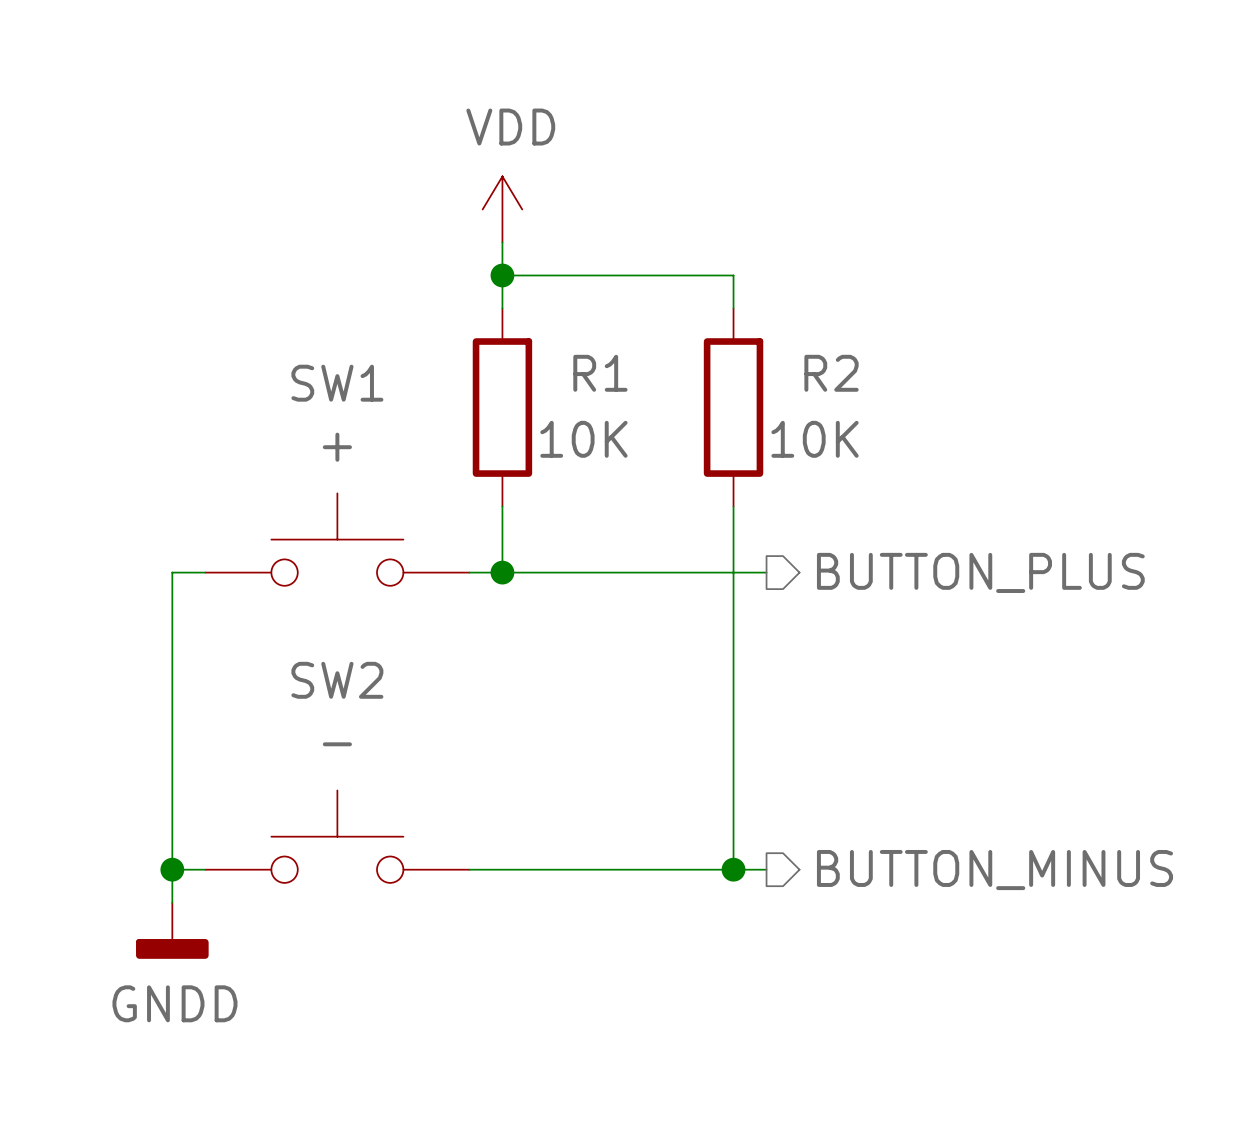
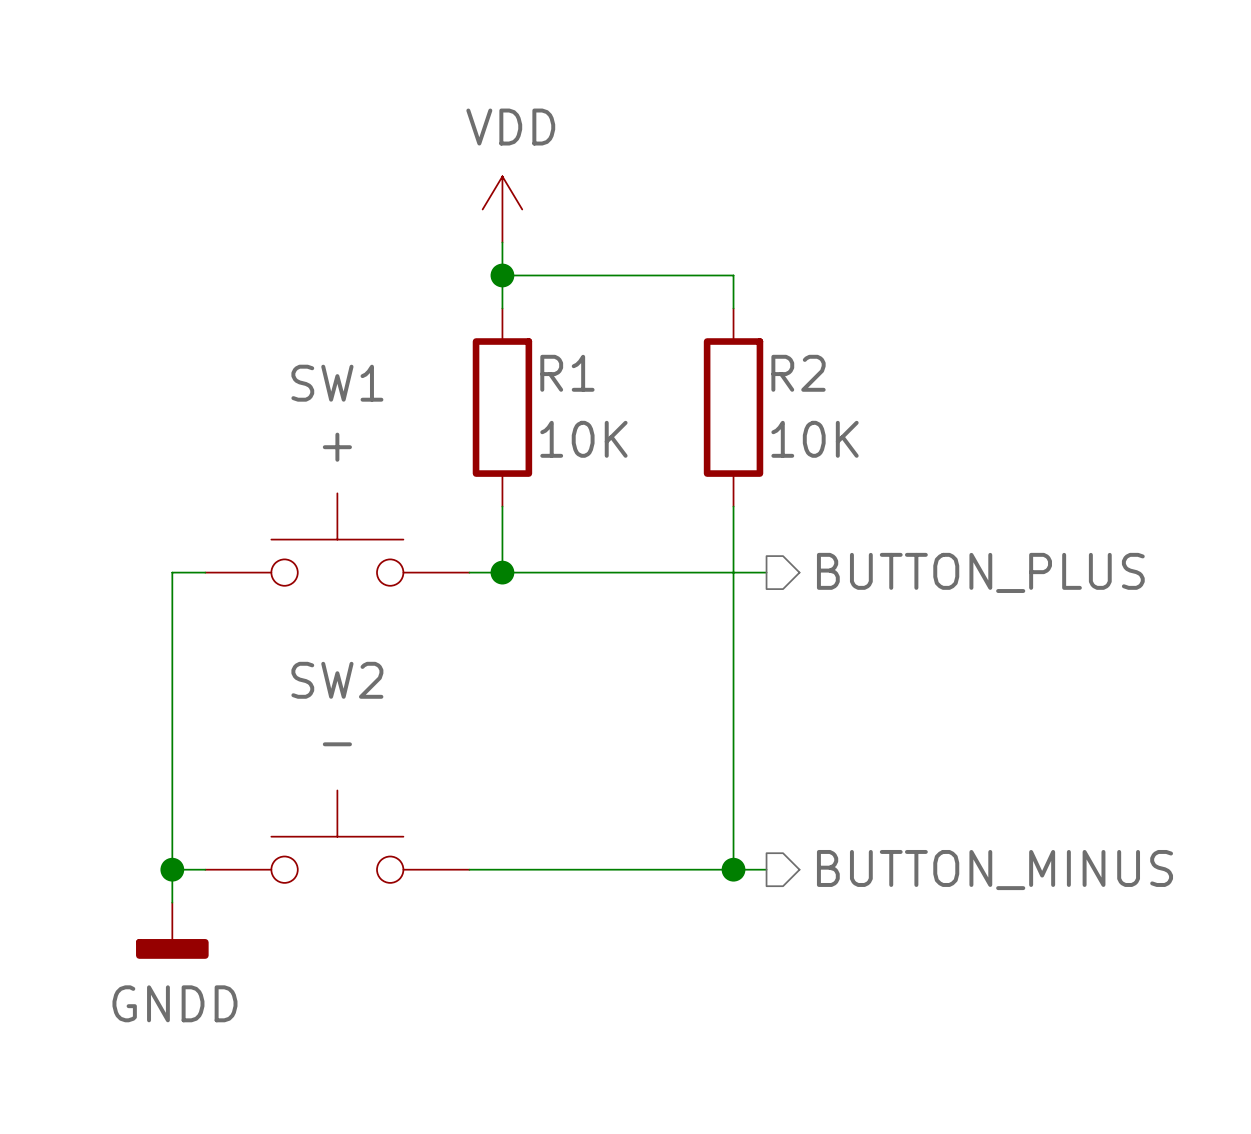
R1 name position: R1 (600, 373) -> R1 (567, 373)
R2 name position: R2 (831, 373) -> R2 (798, 373)

